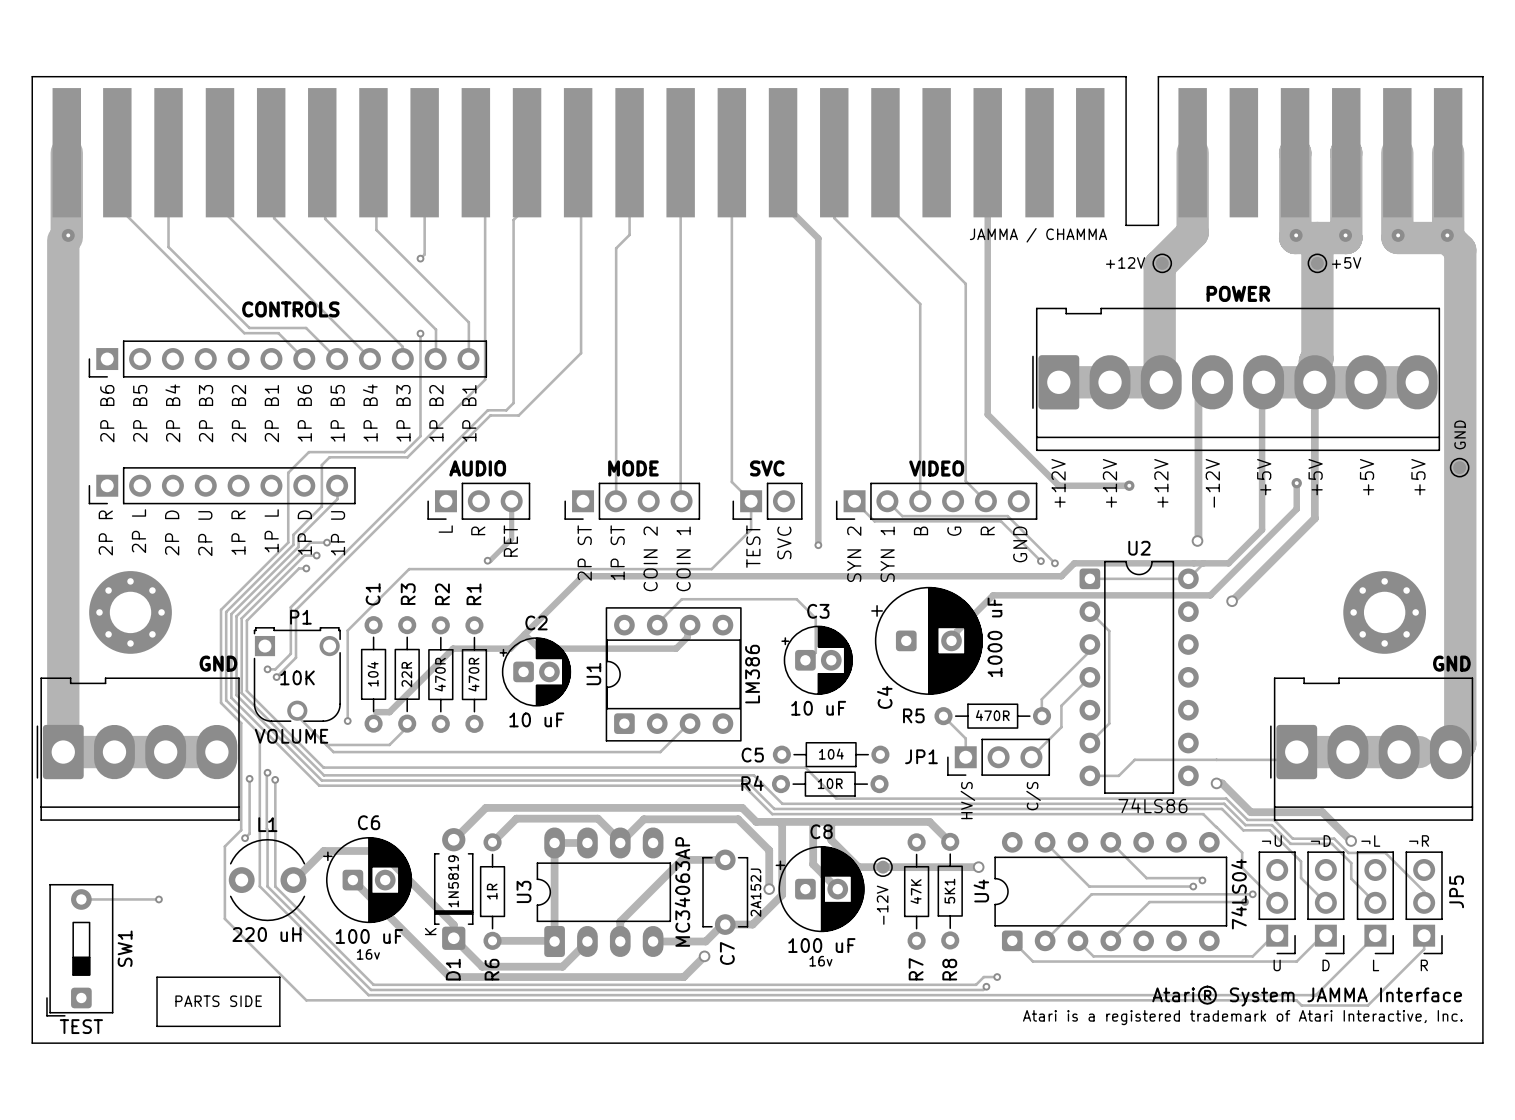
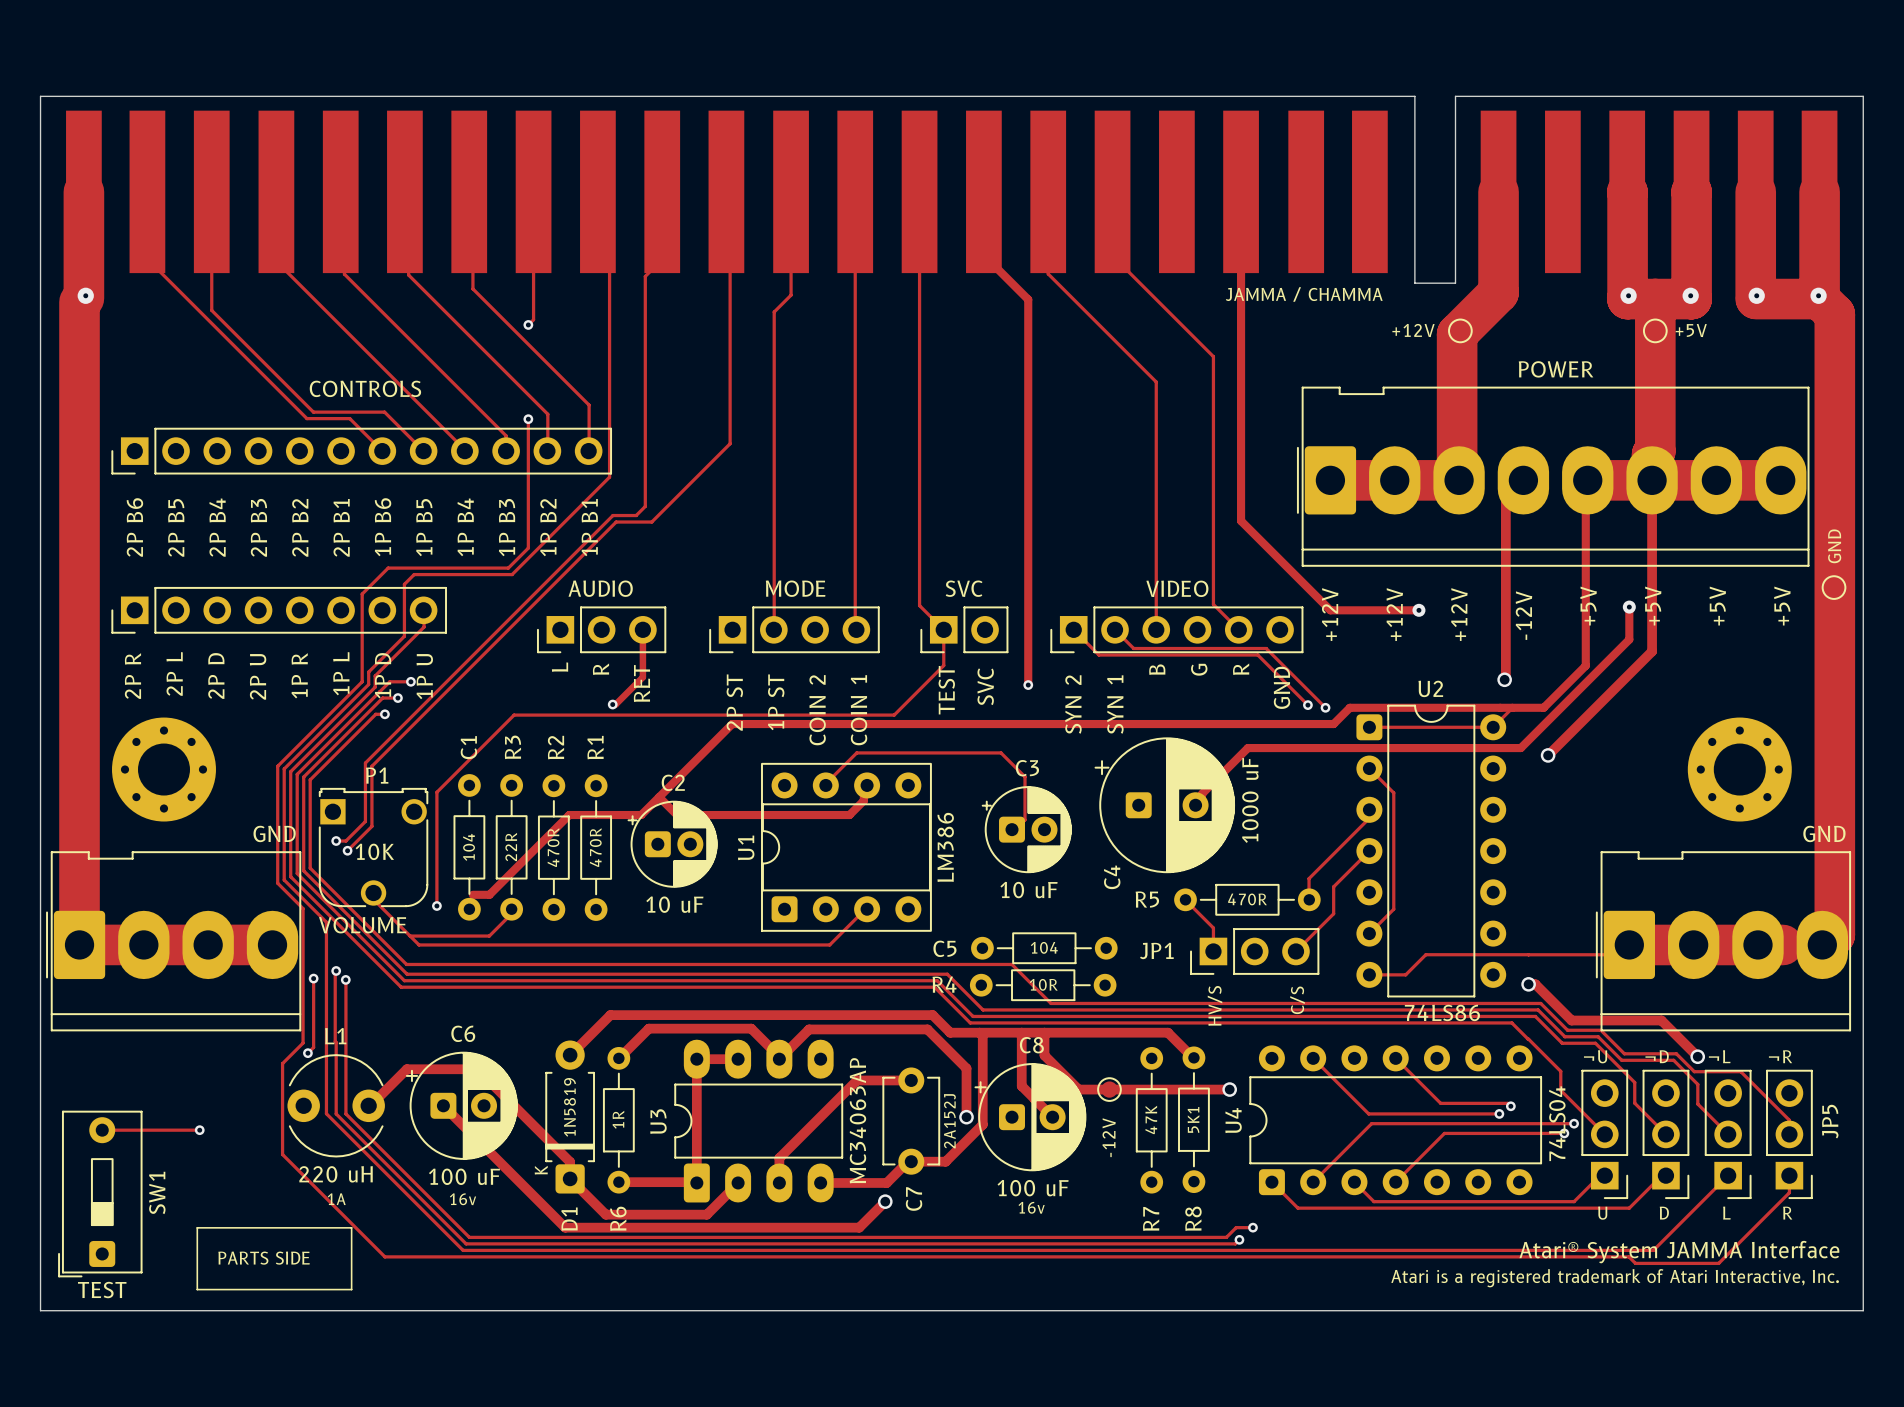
text: none -> 1A (336, 1199)

